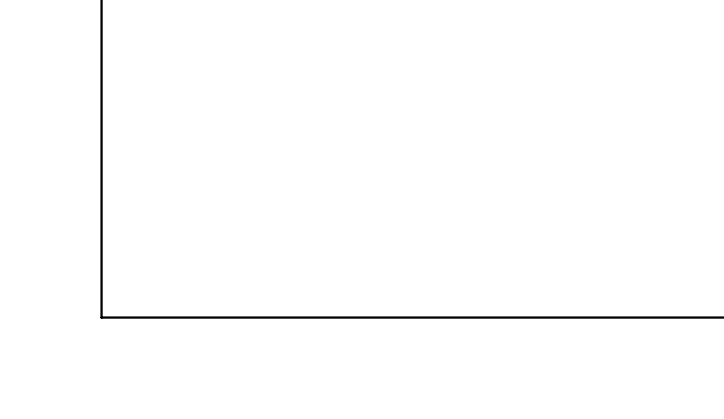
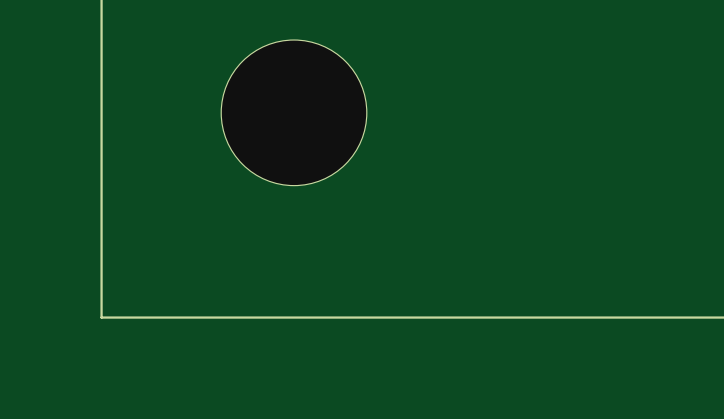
part: none -> (294, 112)

